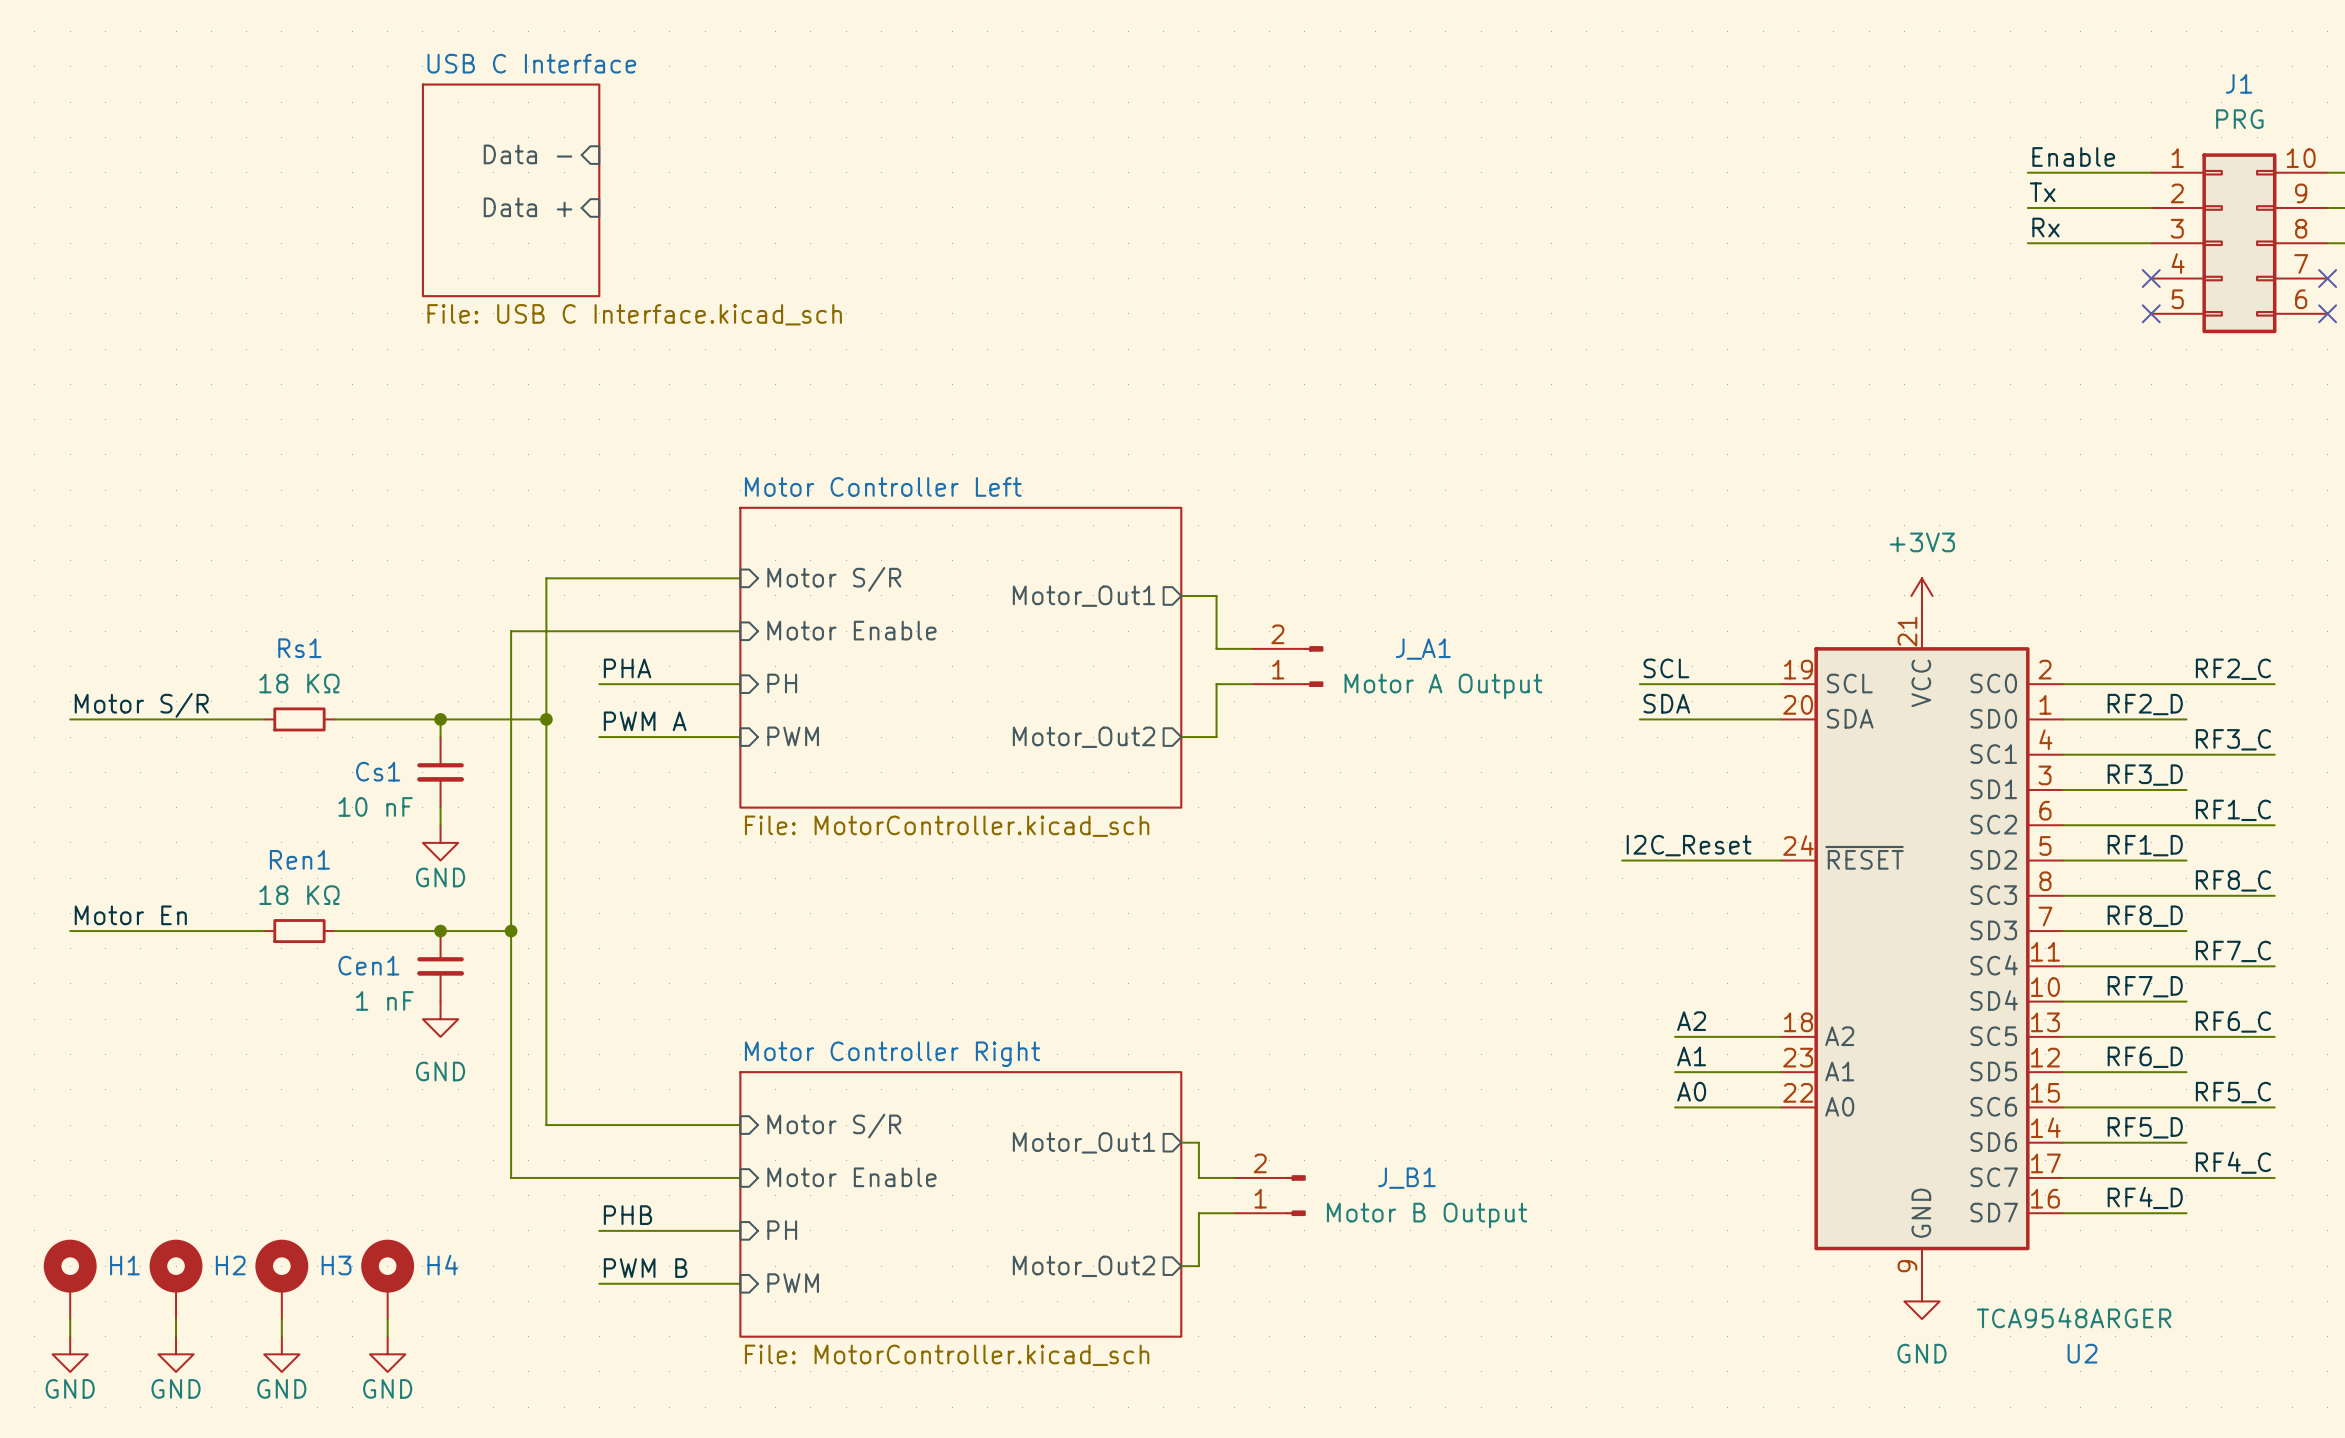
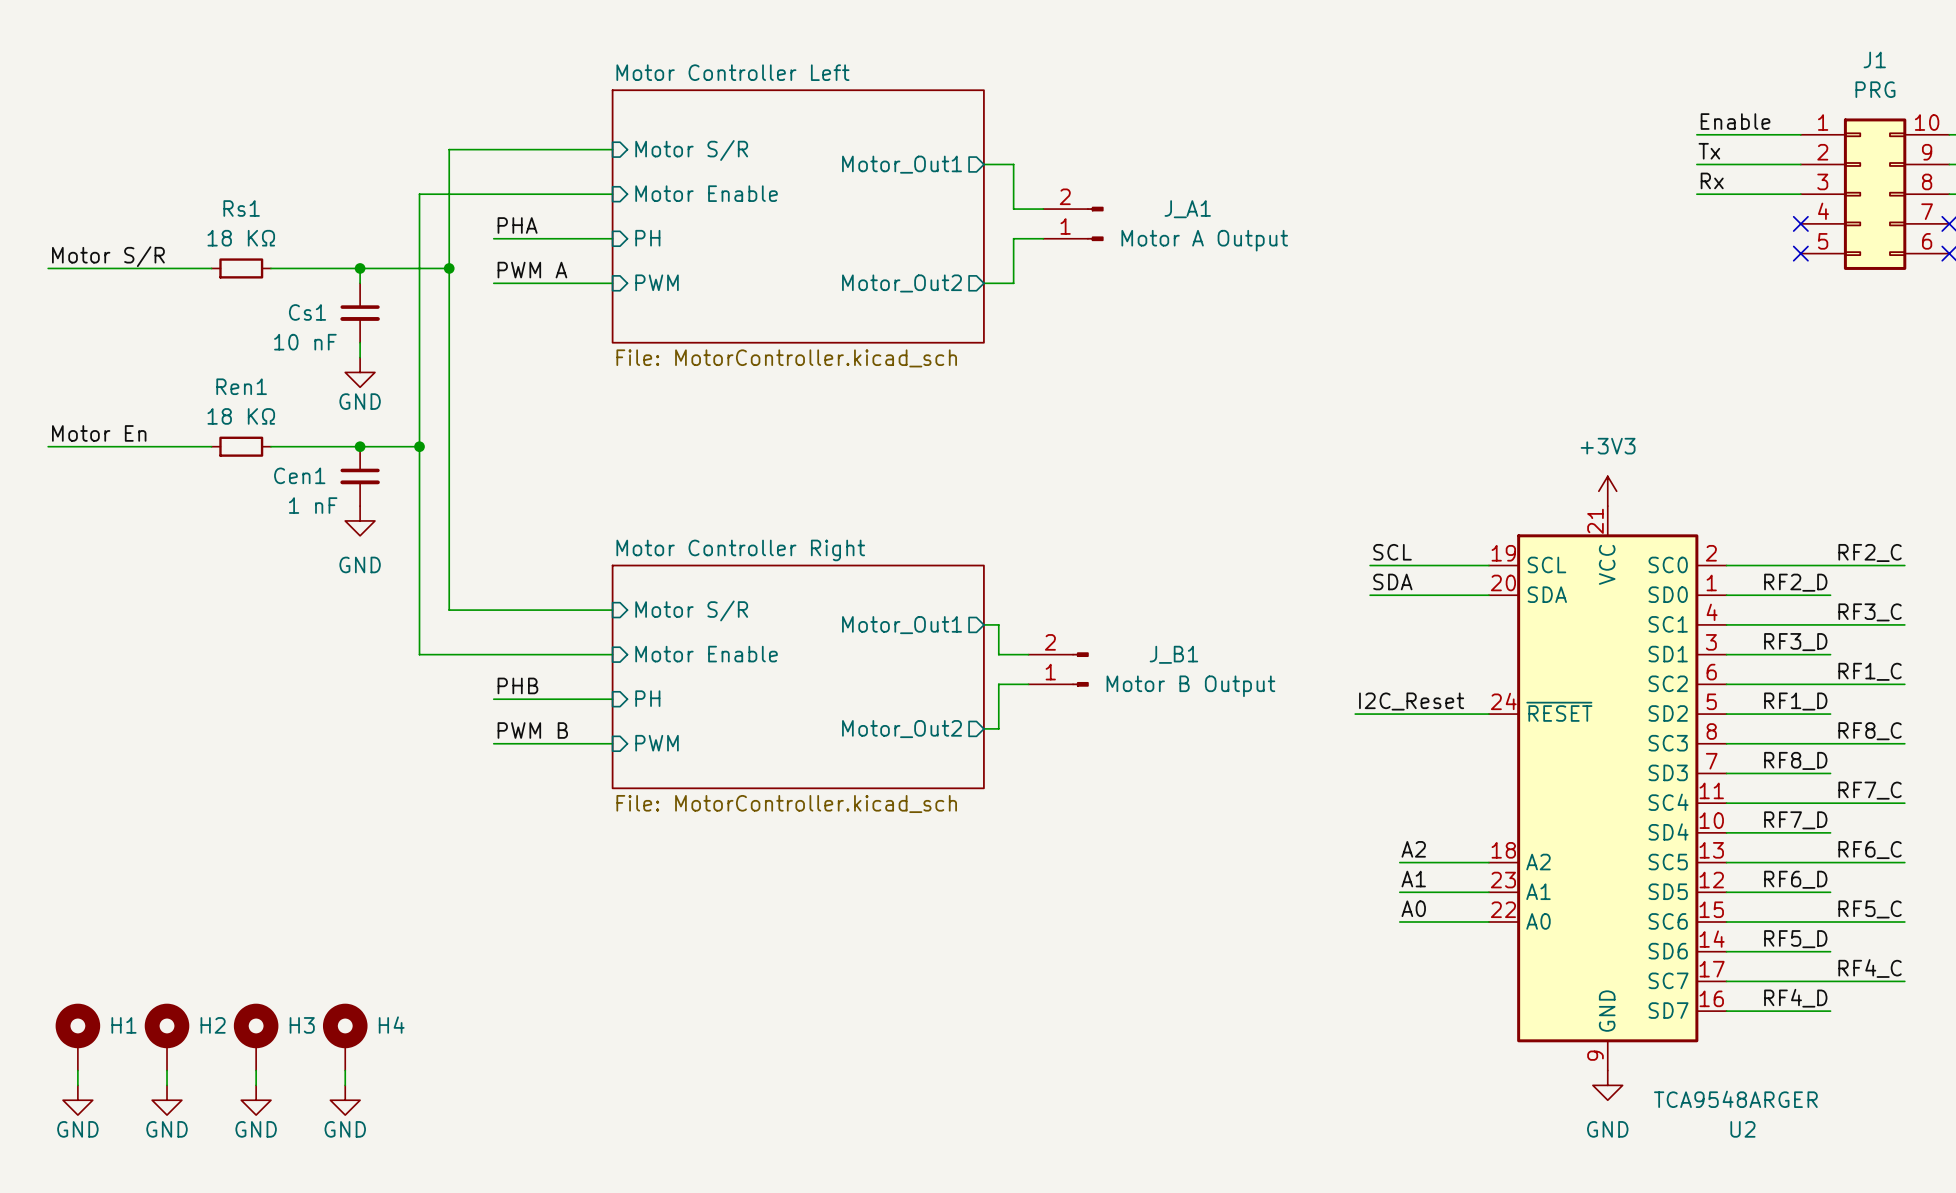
sheet pin: Data - (528, 154) -> none
sheet USB C Interface: File: USB C Interface.kicad_sch (511, 190) -> none
sheet pin: none -> Motor S/R (691, 150)
sheet pin: Data + (528, 207) -> none
wire: none -> (983, 164) (1013, 164) (1013, 209) (1043, 209)
sheet pin: none -> Motor_Out1 (902, 164)
sheet pin: none -> Motor Enable (706, 193)
sheet Motor Controller Left: none -> File: MotorController.kicad_sch (798, 216)
label: none -> PHA (517, 225)
sheet pin: none -> PH (647, 238)
wire: none -> (493, 238) (612, 238)
wire: none -> (1043, 238) (1013, 238) (1013, 283) (983, 283)
label: none -> Motor S/R (108, 256)
wire: none -> (48, 268) (211, 268)
wire: none -> (270, 268) (449, 268)
wire: none -> (360, 268) (360, 283)
junction: none -> (360, 268)
junction: none -> (449, 268)
label: none -> PWM A (532, 270)
sheet pin: none -> PWM (657, 282)
wire: none -> (493, 283) (612, 283)
sheet pin: none -> Motor_Out2 (902, 283)
power symbol: none -> GND (360, 372)
label: none -> Motor En (99, 433)
wire: none -> (270, 446) (419, 446)
junction: none -> (360, 446)
junction: none -> (419, 446)
wire: (546, 578) (740, 578) -> (449, 476) (449, 149) (612, 149)
sheet pin: Motor S/R (834, 579) -> none
wire: (1181, 595) (1216, 595) (1216, 648) (1251, 648) -> none
sheet pin position: Motor_Out1 (1084, 596) -> Motor_Out1 (902, 625)
sheet pin position: Motor Enable (851, 630) -> Motor Enable (706, 654)
power symbol: none -> GND (360, 520)
wire: (511, 631) (740, 631) -> (419, 520) (419, 194) (612, 194)
sheet Motor Controller Left: File: MotorController.kicad_sch (960, 657) -> none
J_A1 position: (1287, 666) -> (1073, 223)
label: PHA (627, 668) -> none
sheet pin position: PH (782, 683) -> PH (647, 698)
wire: (599, 684) (740, 684) -> (493, 699) (612, 699)
wire: (1251, 684) (1216, 684) (1216, 737) (1181, 737) -> none
label: Motor S/R (141, 705) -> none
wire: (70, 719) (264, 719) -> (48, 446) (211, 446)
Rs1 position: (299, 719) -> (241, 268)
wire: (334, 719) (546, 719) -> none
wire: (440, 719) (440, 737) -> (360, 342) (360, 357)
junction: (440, 719) -> none
junction: (546, 719) -> none
label: PWM A (645, 721) -> none
sheet pin: PWM (793, 736) -> Motor S/R (691, 610)
wire: (546, 737) (546, 1125) (740, 1125) -> (449, 610) (493, 610)
sheet pin position: Motor_Out2 (1084, 737) -> Motor_Out2 (902, 729)
wire: none -> (983, 624) (998, 624) (998, 654) (1028, 654)
Cs1 position: (440, 772) -> (360, 313)
wire: (511, 789) (511, 1177) (740, 1177) -> (419, 654) (612, 654)
wire: (440, 807) (440, 825) -> none
sheet Motor Controller Right: none -> File: MotorController.kicad_sch (798, 676)
wire: none -> (1028, 684) (998, 684) (998, 728) (983, 728)
label: none -> PHB (517, 685)
power symbol: GND (440, 842) -> none
label: none -> PWM B (532, 730)
sheet pin: none -> PWM (657, 743)
label: Motor En (130, 915) -> none
wire: (70, 931) (264, 931) -> none
Ren1 position: (299, 931) -> (241, 446)
wire: (334, 931) (511, 931) -> none
junction: (440, 931) -> none
junction: (511, 931) -> none
Cen1 position: (440, 966) -> (360, 476)
power symbol: GND (440, 1019) -> none
sheet pin: Motor S/R (834, 1126) -> none
sheet pin: Motor_Out1 (1084, 1142) -> none
wire: (1181, 1142) (1198, 1142) (1198, 1177) (1234, 1177) -> none
sheet pin: Motor Enable (851, 1177) -> none
J_B1 position: (1269, 1195) -> (1058, 669)
sheet Motor Controller Right: File: MotorController.kicad_sch (960, 1204) -> none
wire: (1234, 1213) (1198, 1213) (1198, 1266) (1181, 1266) -> none
label: PHB (627, 1215) -> none
wire: (599, 1230) (740, 1230) -> (493, 743) (612, 743)
sheet pin: PH (782, 1230) -> none
sheet pin: Motor_Out2 (1084, 1266) -> none
label: PWM B (645, 1268) -> none
H1 position: (70, 1279) -> (77, 1037)
H2 position: (176, 1279) -> (167, 1037)
H3 position: (281, 1279) -> (256, 1037)
H4 position: (387, 1279) -> (345, 1037)
wire: (599, 1283) (740, 1283) -> none
sheet pin: PWM (793, 1283) -> none
wire: (70, 1319) (70, 1336) -> (77, 1070) (77, 1085)
power symbol: none -> GND (77, 1100)
wire: (176, 1319) (176, 1336) -> (167, 1070) (167, 1085)
power symbol: none -> GND (167, 1100)
wire: (281, 1319) (281, 1336) -> (256, 1070) (256, 1085)
power symbol: none -> GND (256, 1100)
wire: (387, 1319) (387, 1336) -> (345, 1070) (345, 1085)
power symbol: none -> GND (345, 1100)
power symbol: GND (70, 1354) -> none
power symbol: GND (176, 1354) -> none
power symbol: GND (281, 1354) -> none
power symbol: GND (387, 1354) -> none

